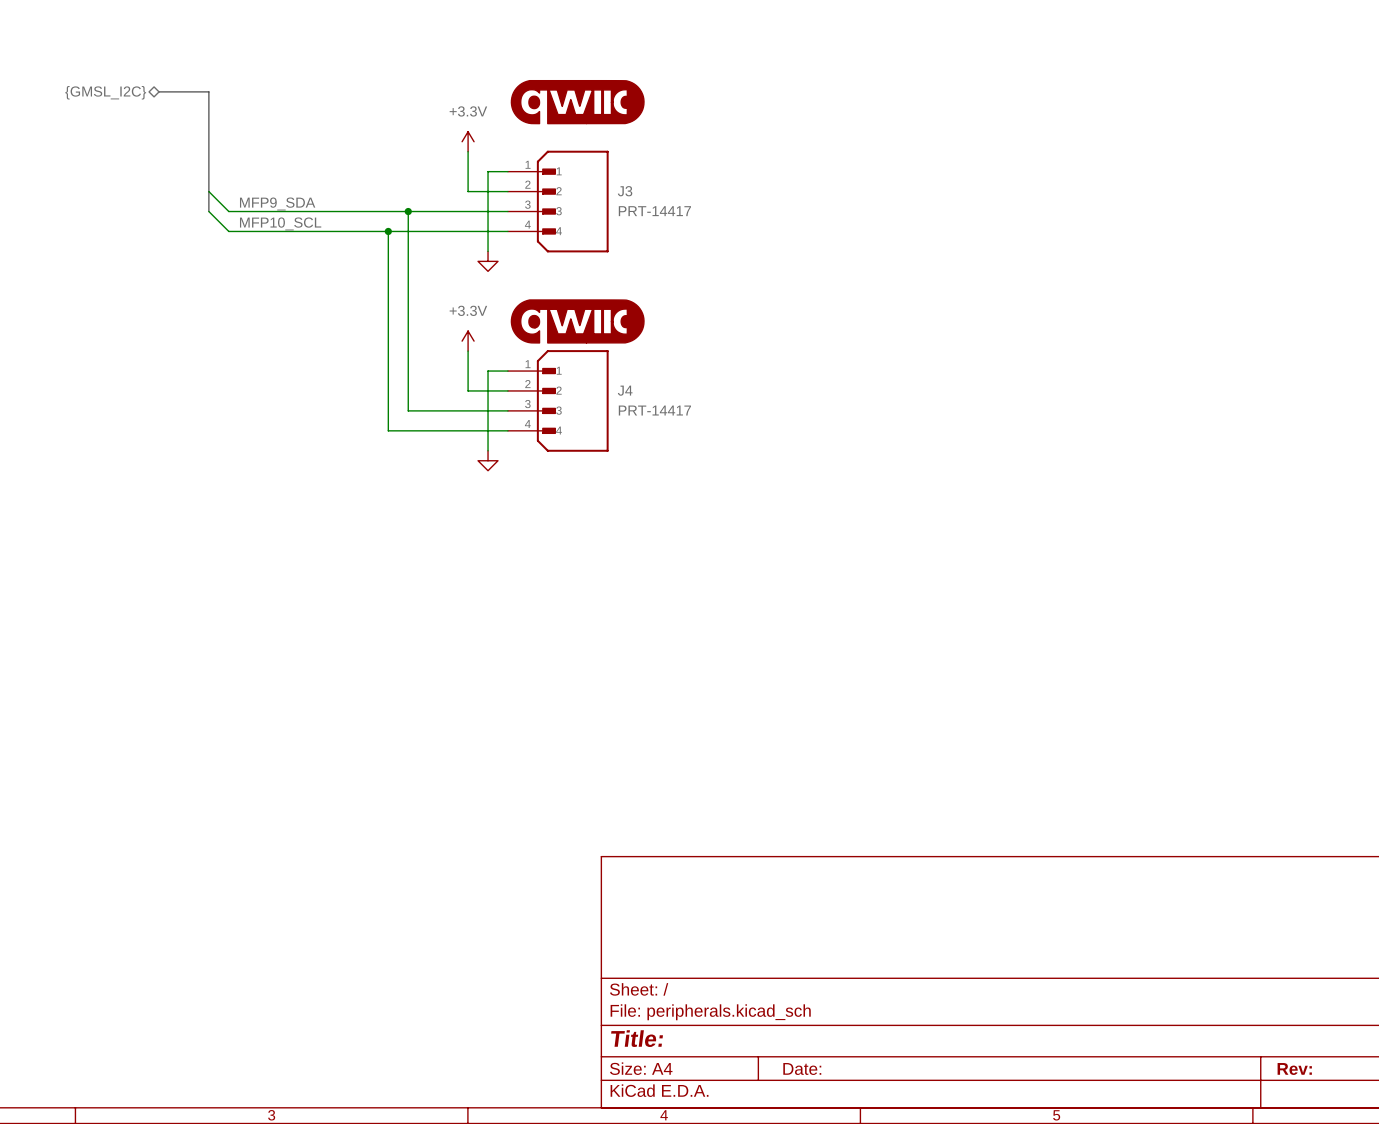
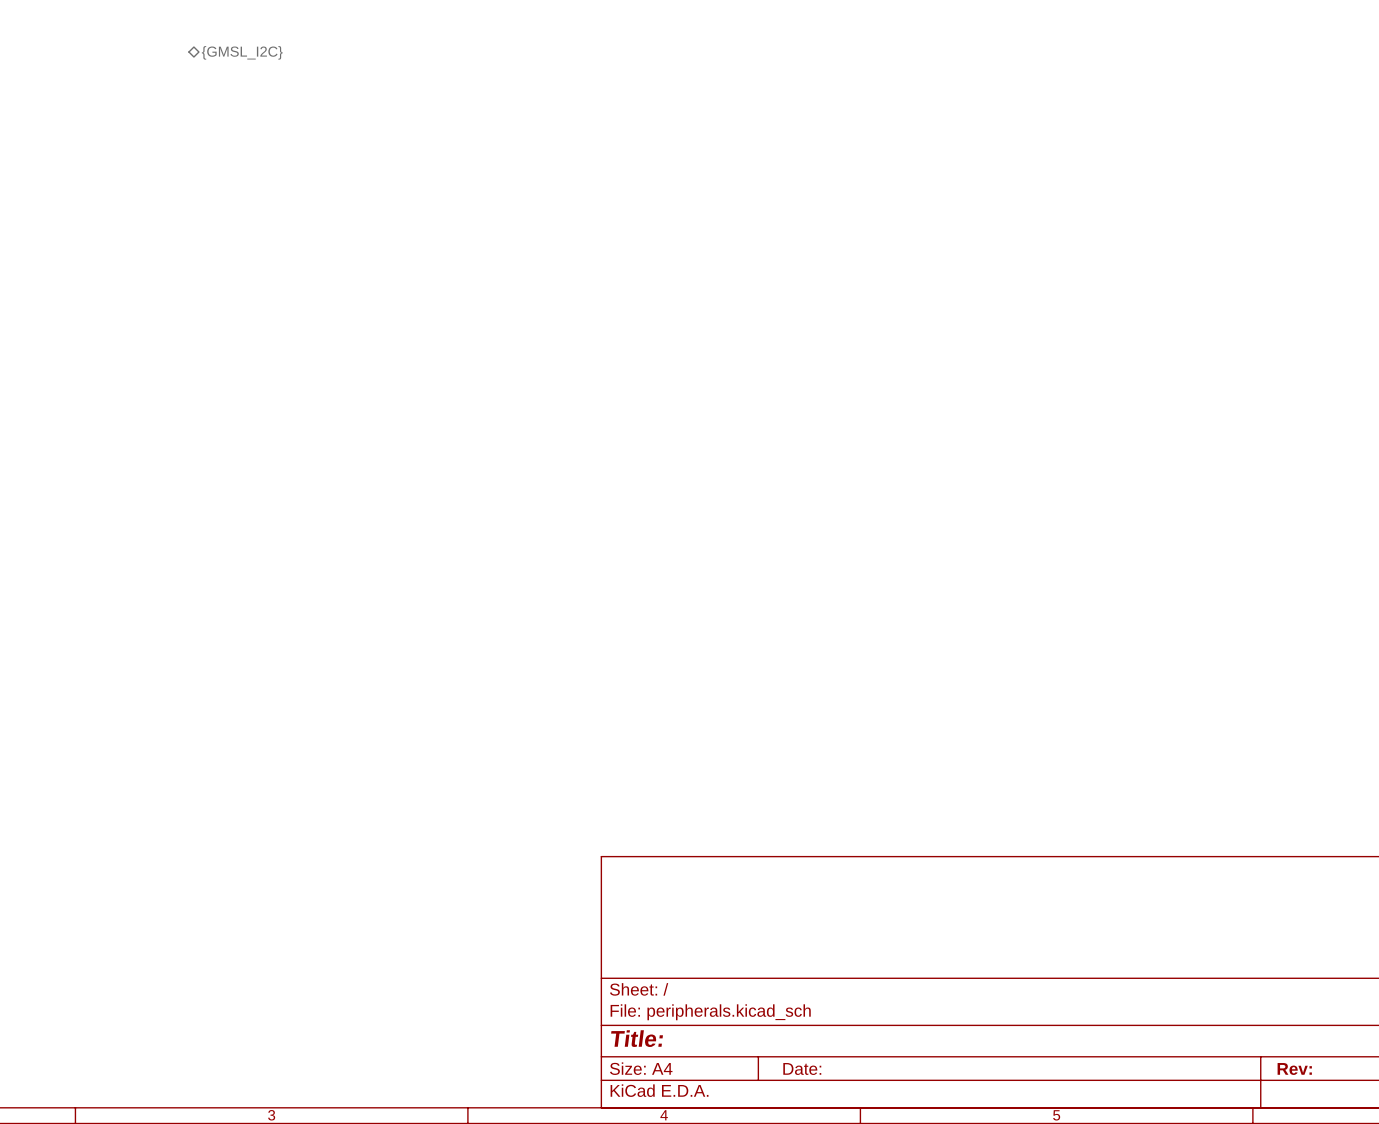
bus: (159, 91) (208, 91) (208, 211) -> none
hierarchical label rotation: 0° (105, 92) -> 180° (242, 52)
hierarchical label position: {GMSL_I2C} (105, 92) -> {GMSL_I2C} (242, 52)
part: (577, 102) -> none
power symbol: +3.3V (468, 141) -> none
wire: (468, 151) (468, 191) (507, 191) -> none
wire: (507, 171) (488, 171) (488, 251) -> none
wire: (208, 191) (228, 211) (507, 211) -> none
J3: PRT-14417 (558, 201) -> none
label: MFP9_SDA (277, 203) -> none
wire: (208, 211) (228, 231) (507, 231) -> none
wire: (408, 211) (408, 410) (507, 410) -> none
junction: (408, 211) -> none
label: MFP10_SCL (280, 223) -> none
wire: (388, 231) (388, 430) (507, 430) -> none
junction: (388, 231) -> none
power symbol: (488, 261) -> none
part: (577, 321) -> none
power symbol: +3.3V (468, 341) -> none
wire: (468, 351) (468, 390) (507, 390) -> none
wire: (507, 371) (488, 371) (488, 450) -> none
J4: PRT-14417 (558, 400) -> none
power symbol: (488, 460) -> none

